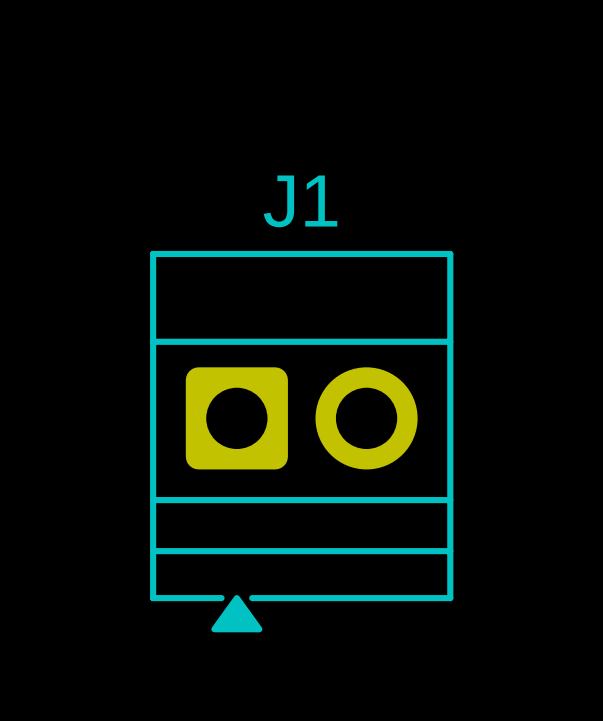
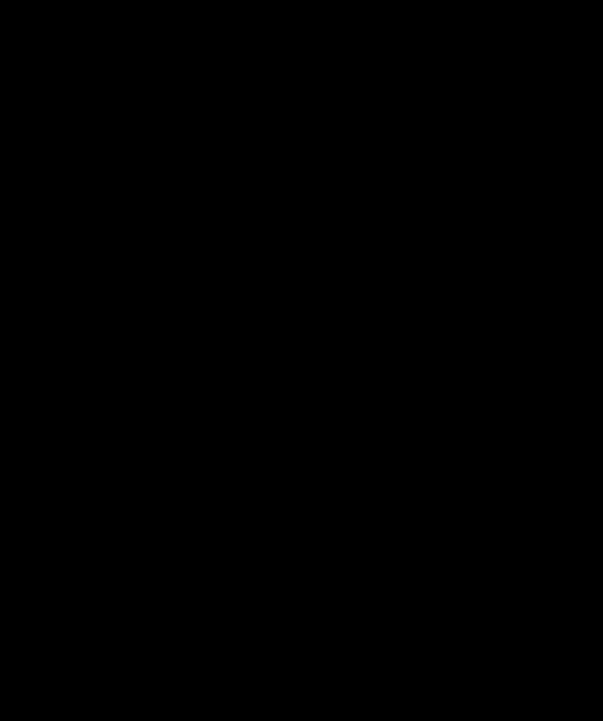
J1: (301, 441) -> none

